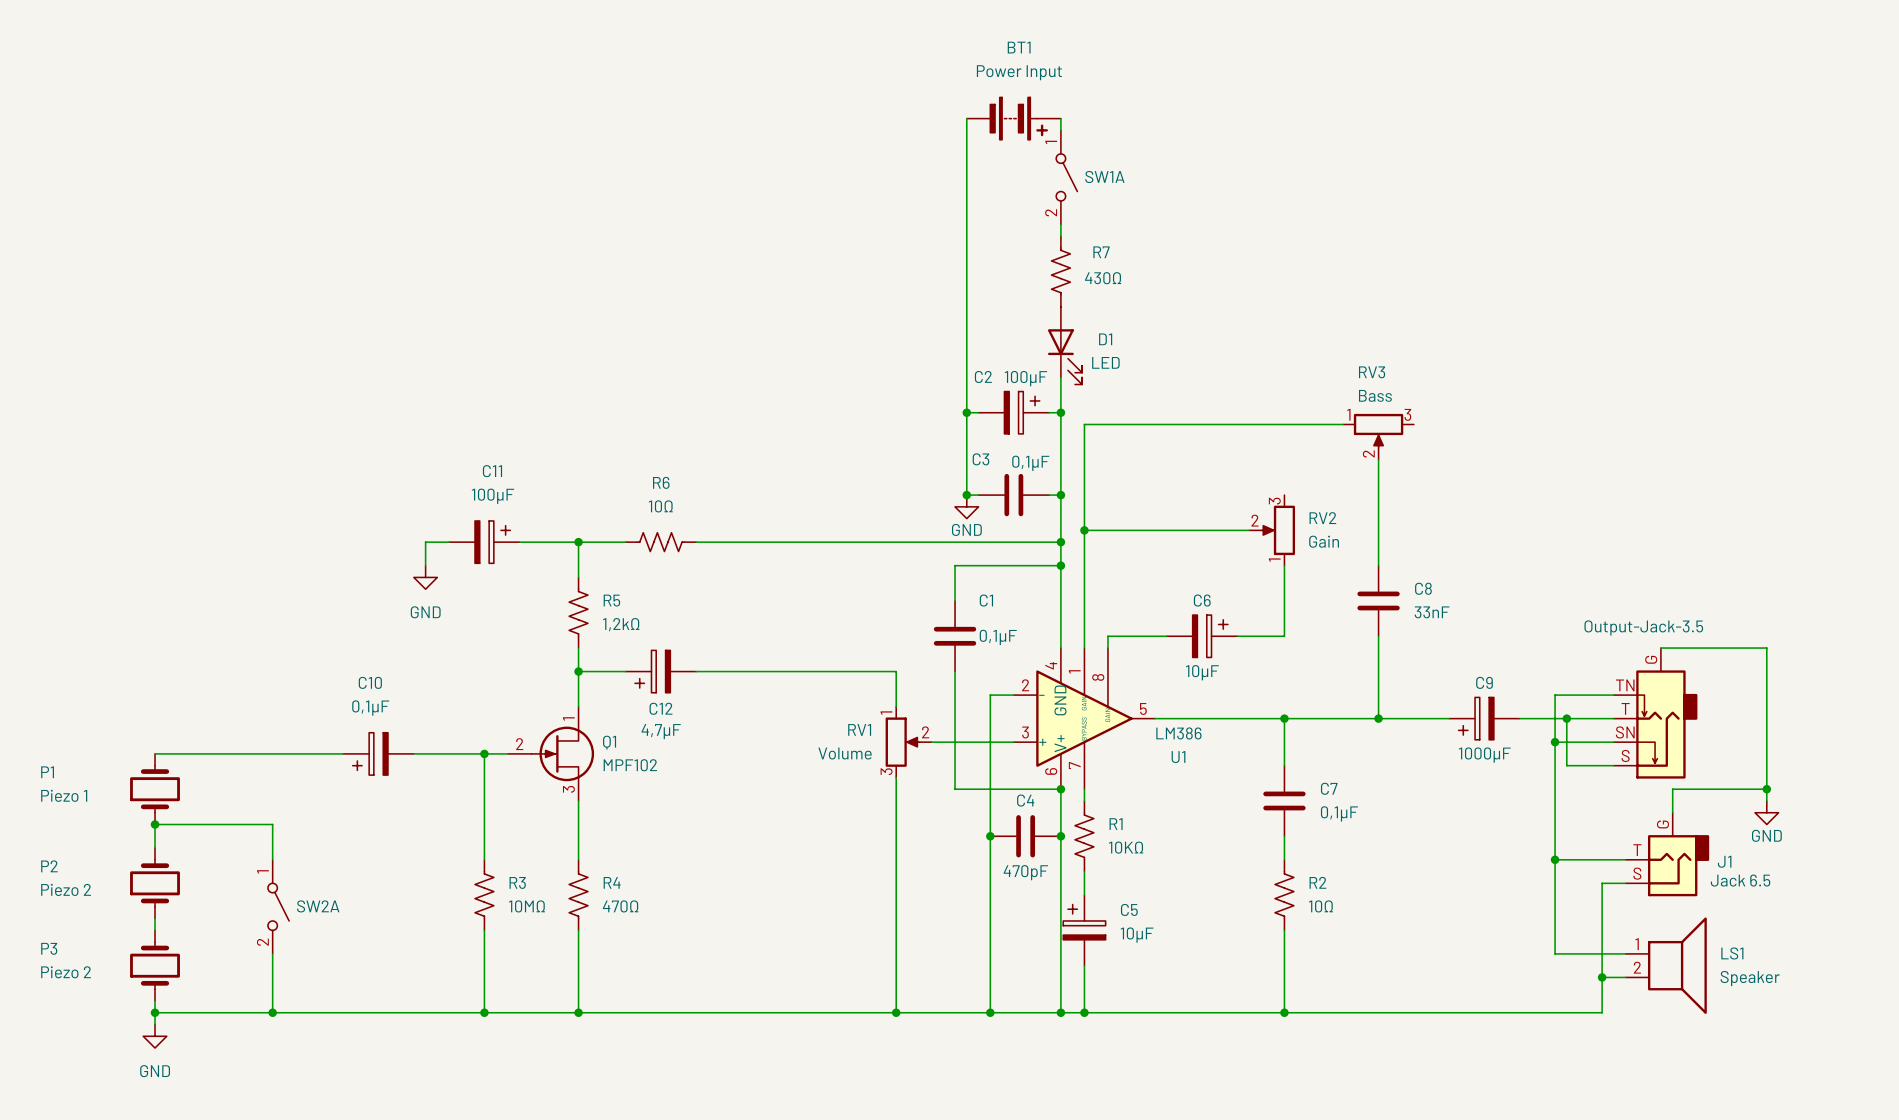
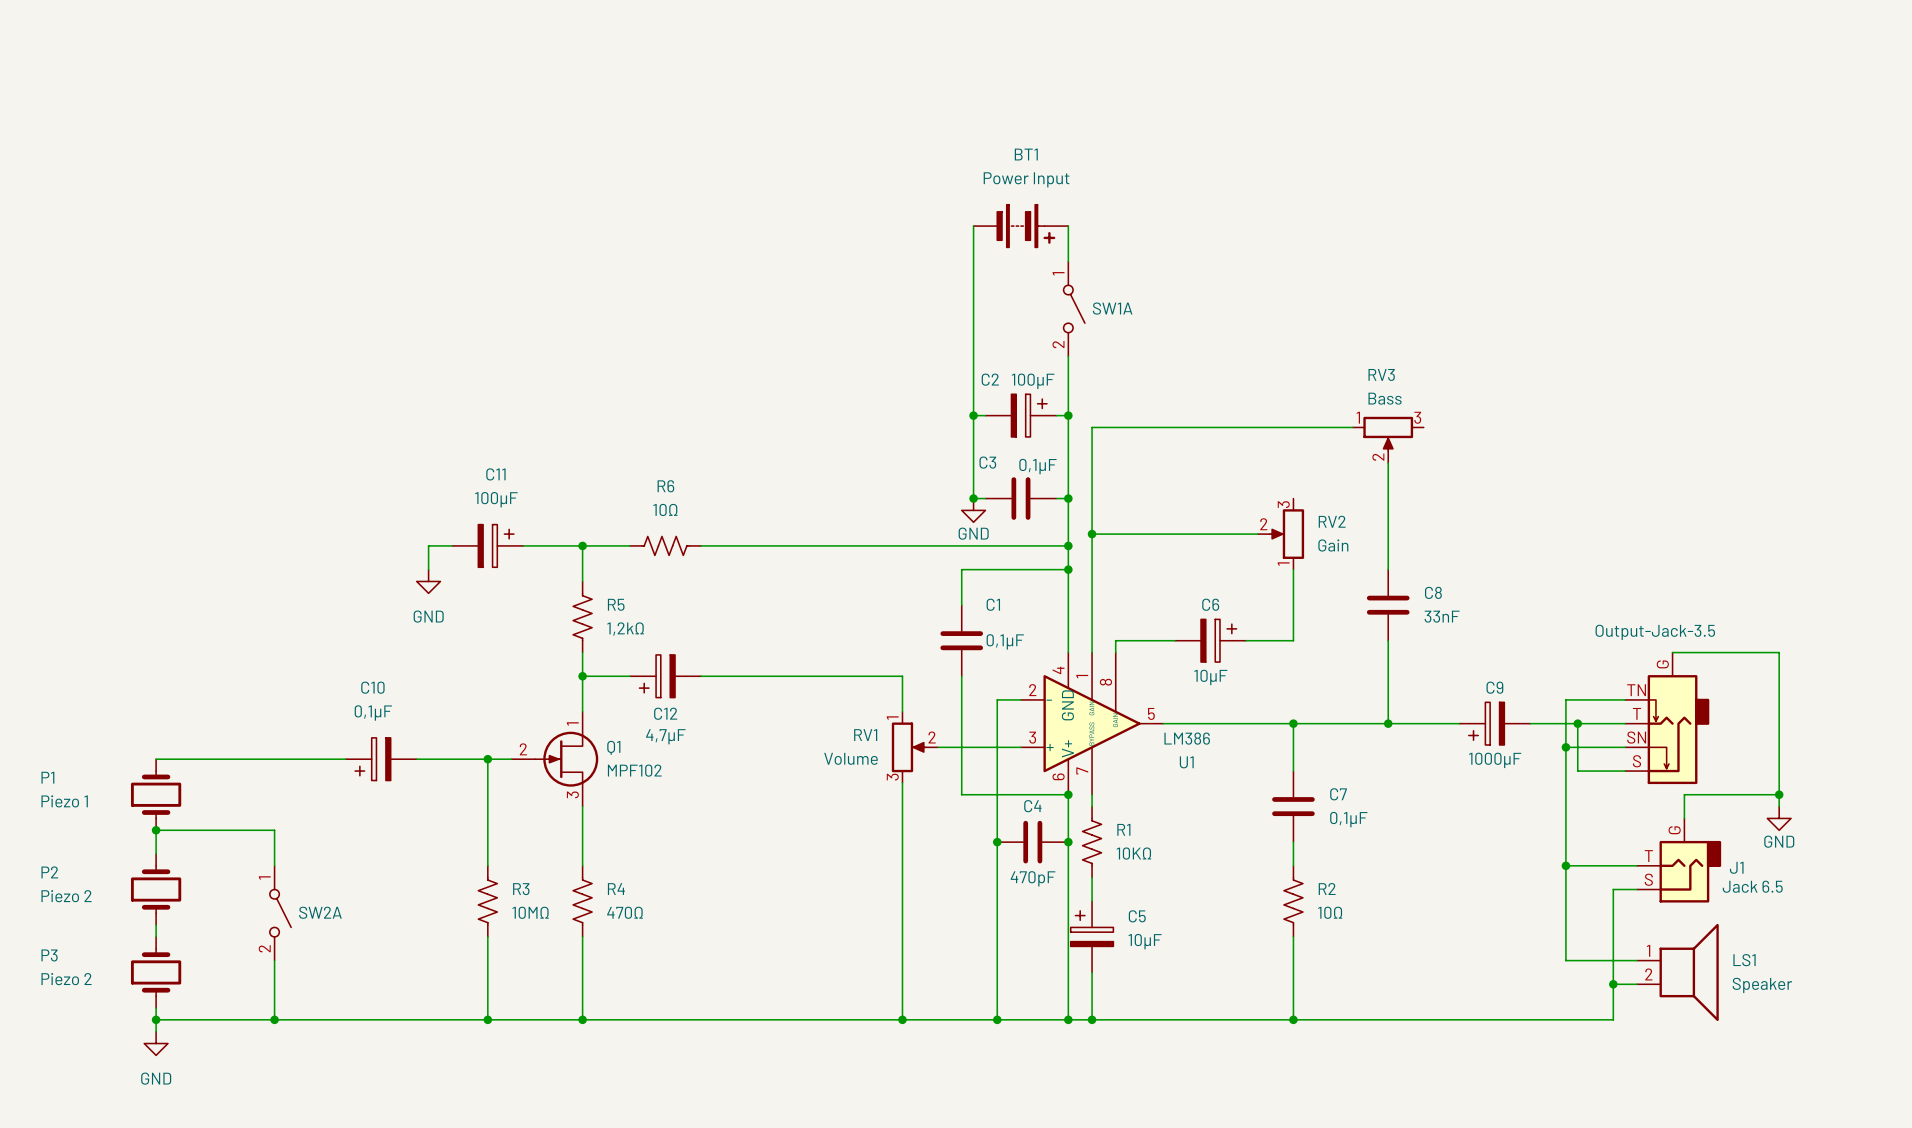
wire: (966, 118) (966, 224) -> none
BT1 position: (1013, 118) -> (1020, 226)
wire: (1060, 118) (1060, 130) -> none
SW1A position: (1066, 177) -> (1074, 308)
R7: 430Ω (1060, 271) -> none
D1: LED (1065, 345) -> none

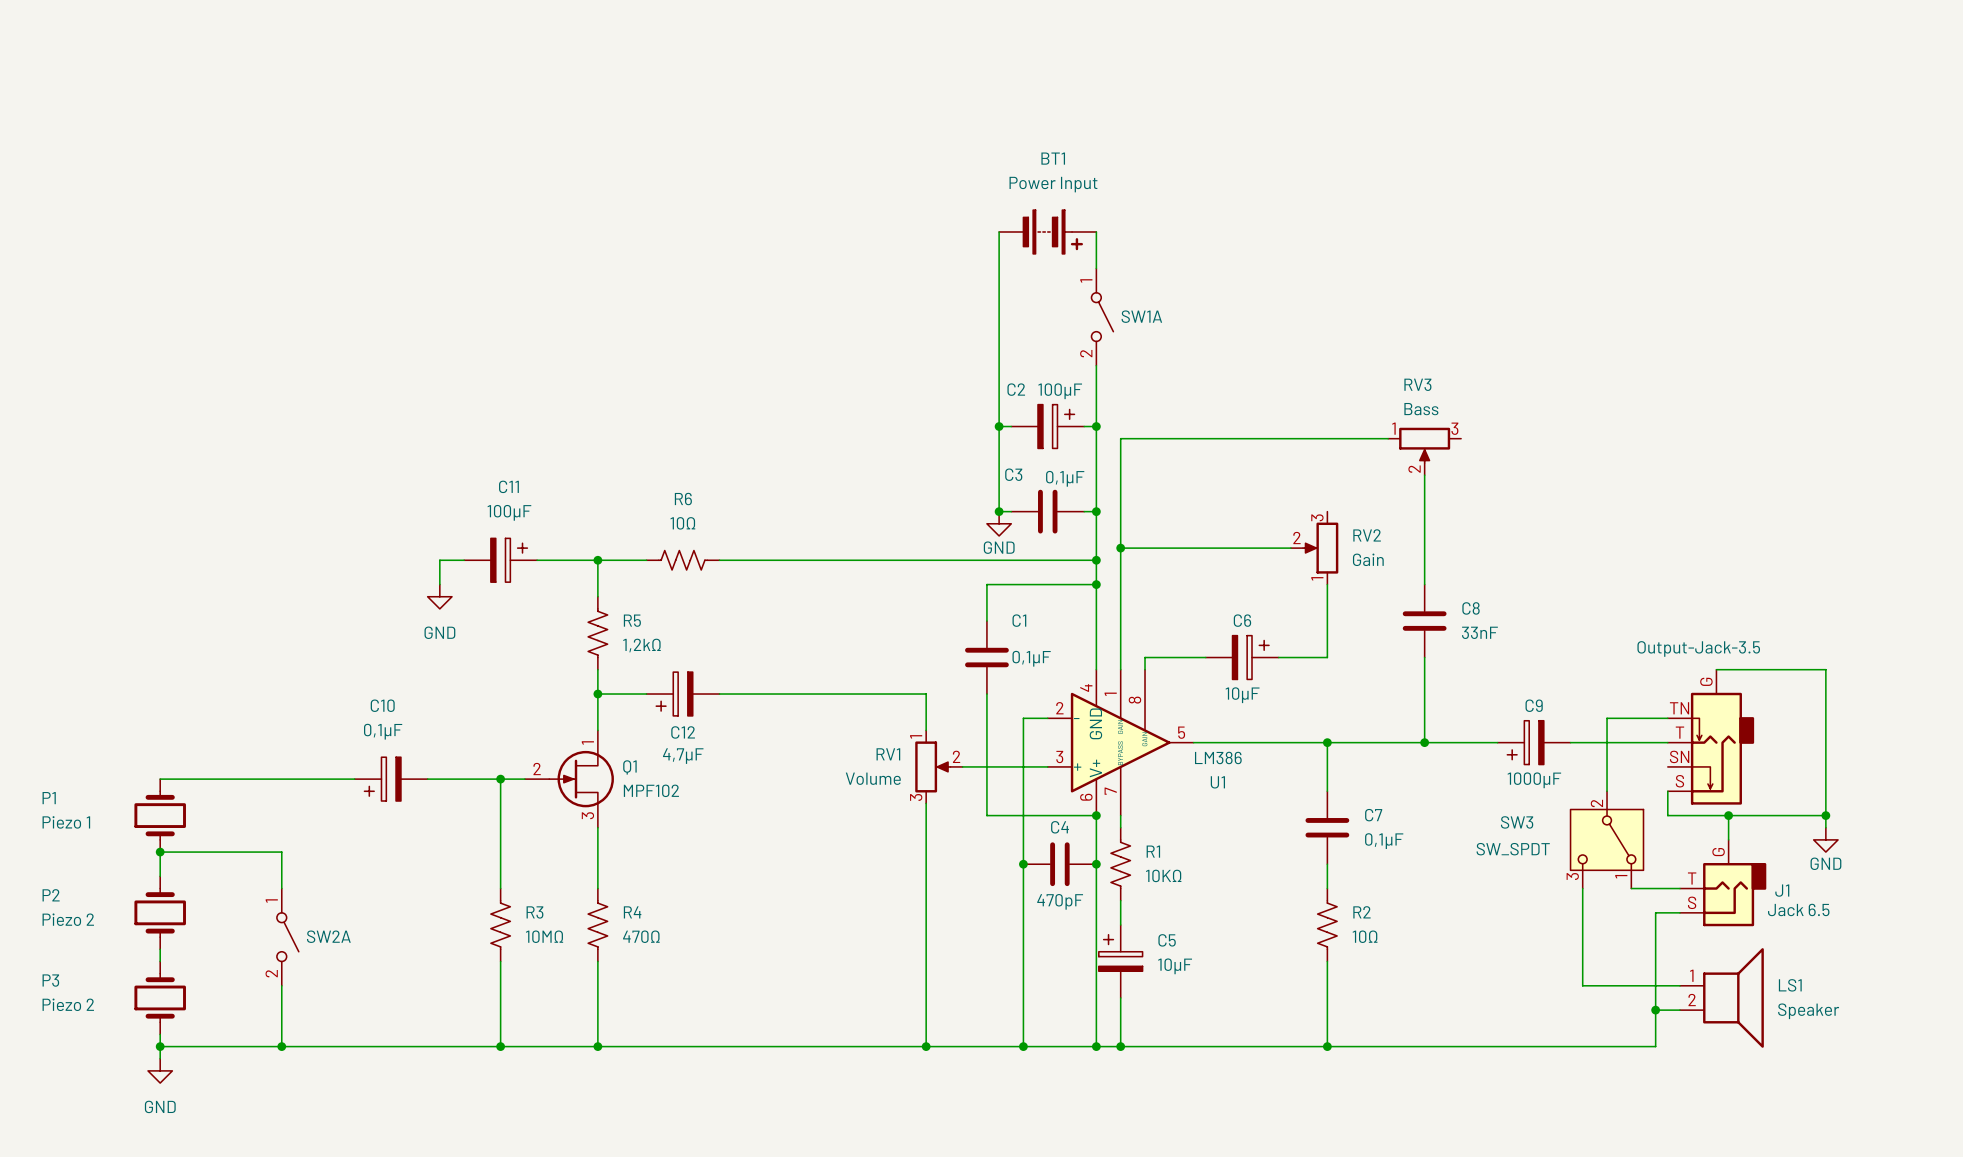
wire: (1577, 723) (1577, 771) (1625, 771) -> (1728, 815) (1667, 815) (1667, 791)
junction: (1577, 723) -> none
wire: (1565, 747) (1625, 747) -> none
junction: (1565, 747) -> none
wire: (1565, 771) (1565, 960) -> (1582, 888) (1582, 985) (1607, 985)
junction: none -> (1728, 815)
SW3: none -> SW_SPDT (1607, 839)
wire: (1565, 865) (1589, 865) -> none
junction: (1565, 865) -> none

